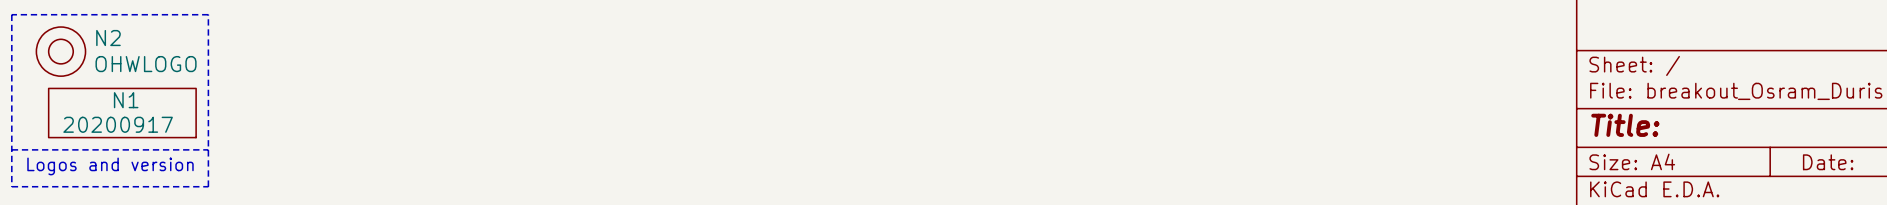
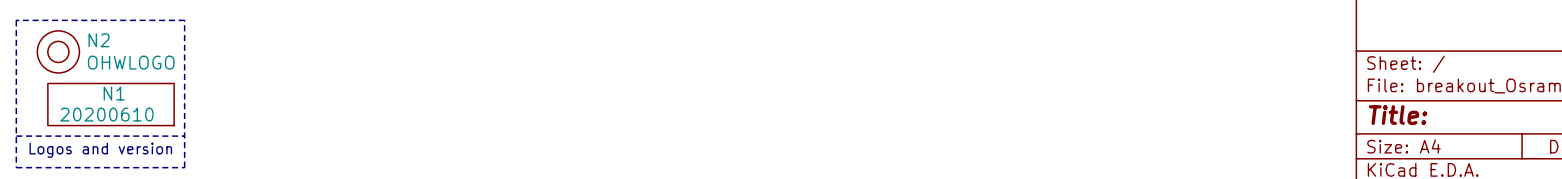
N1 value: 20200917 (118, 124) -> 20200610 (107, 114)

